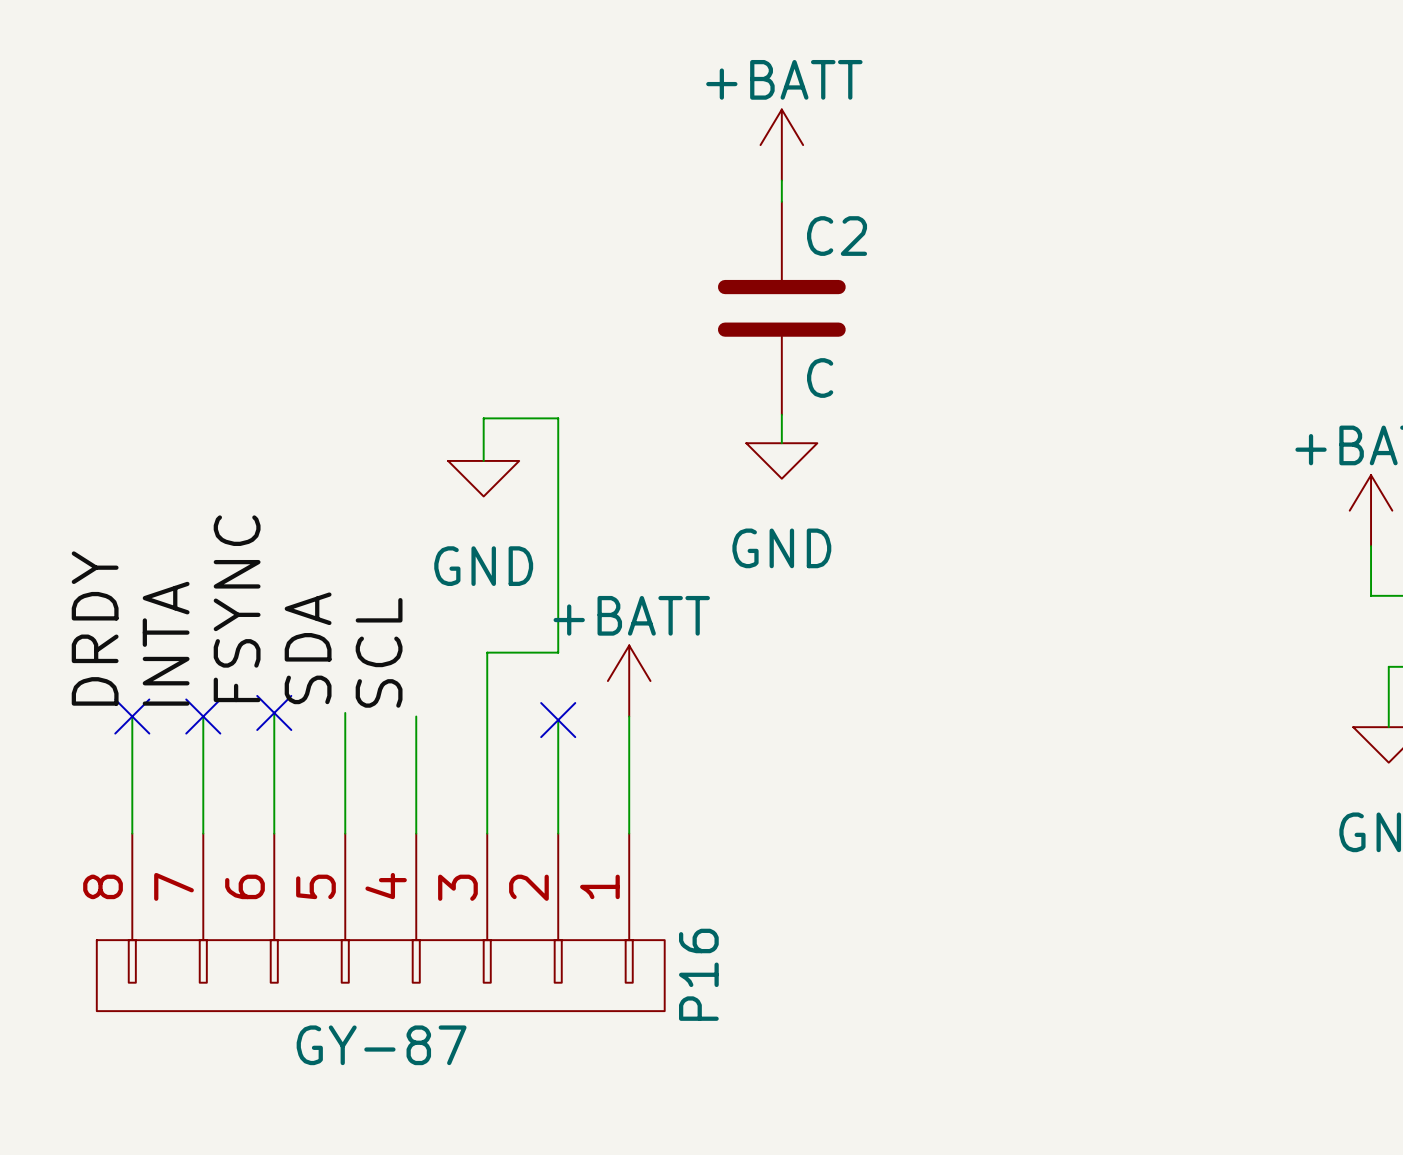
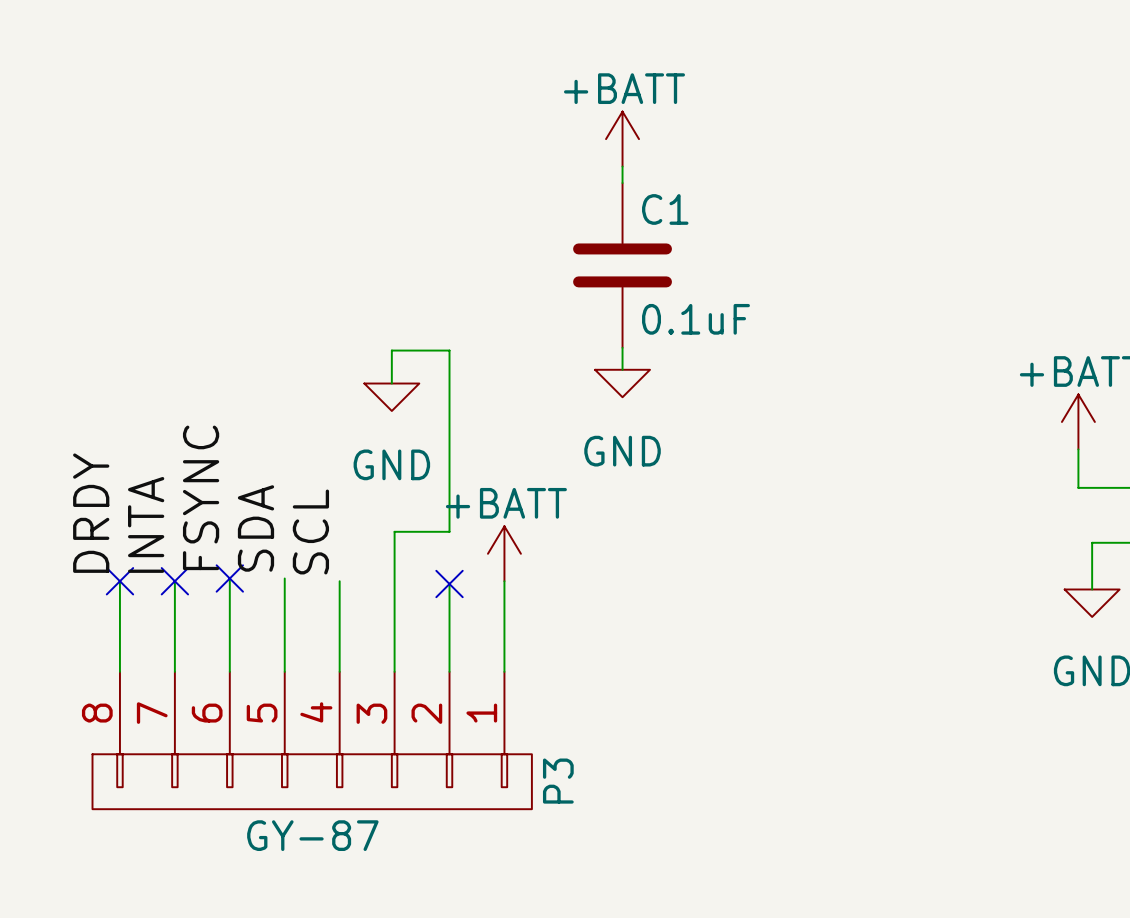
C2 name: C2 (837, 236) -> C1 (665, 209)
C2 value: C (820, 378) -> 0.1uF (695, 319)
P16 name: P16 (698, 974) -> P3 (558, 781)

